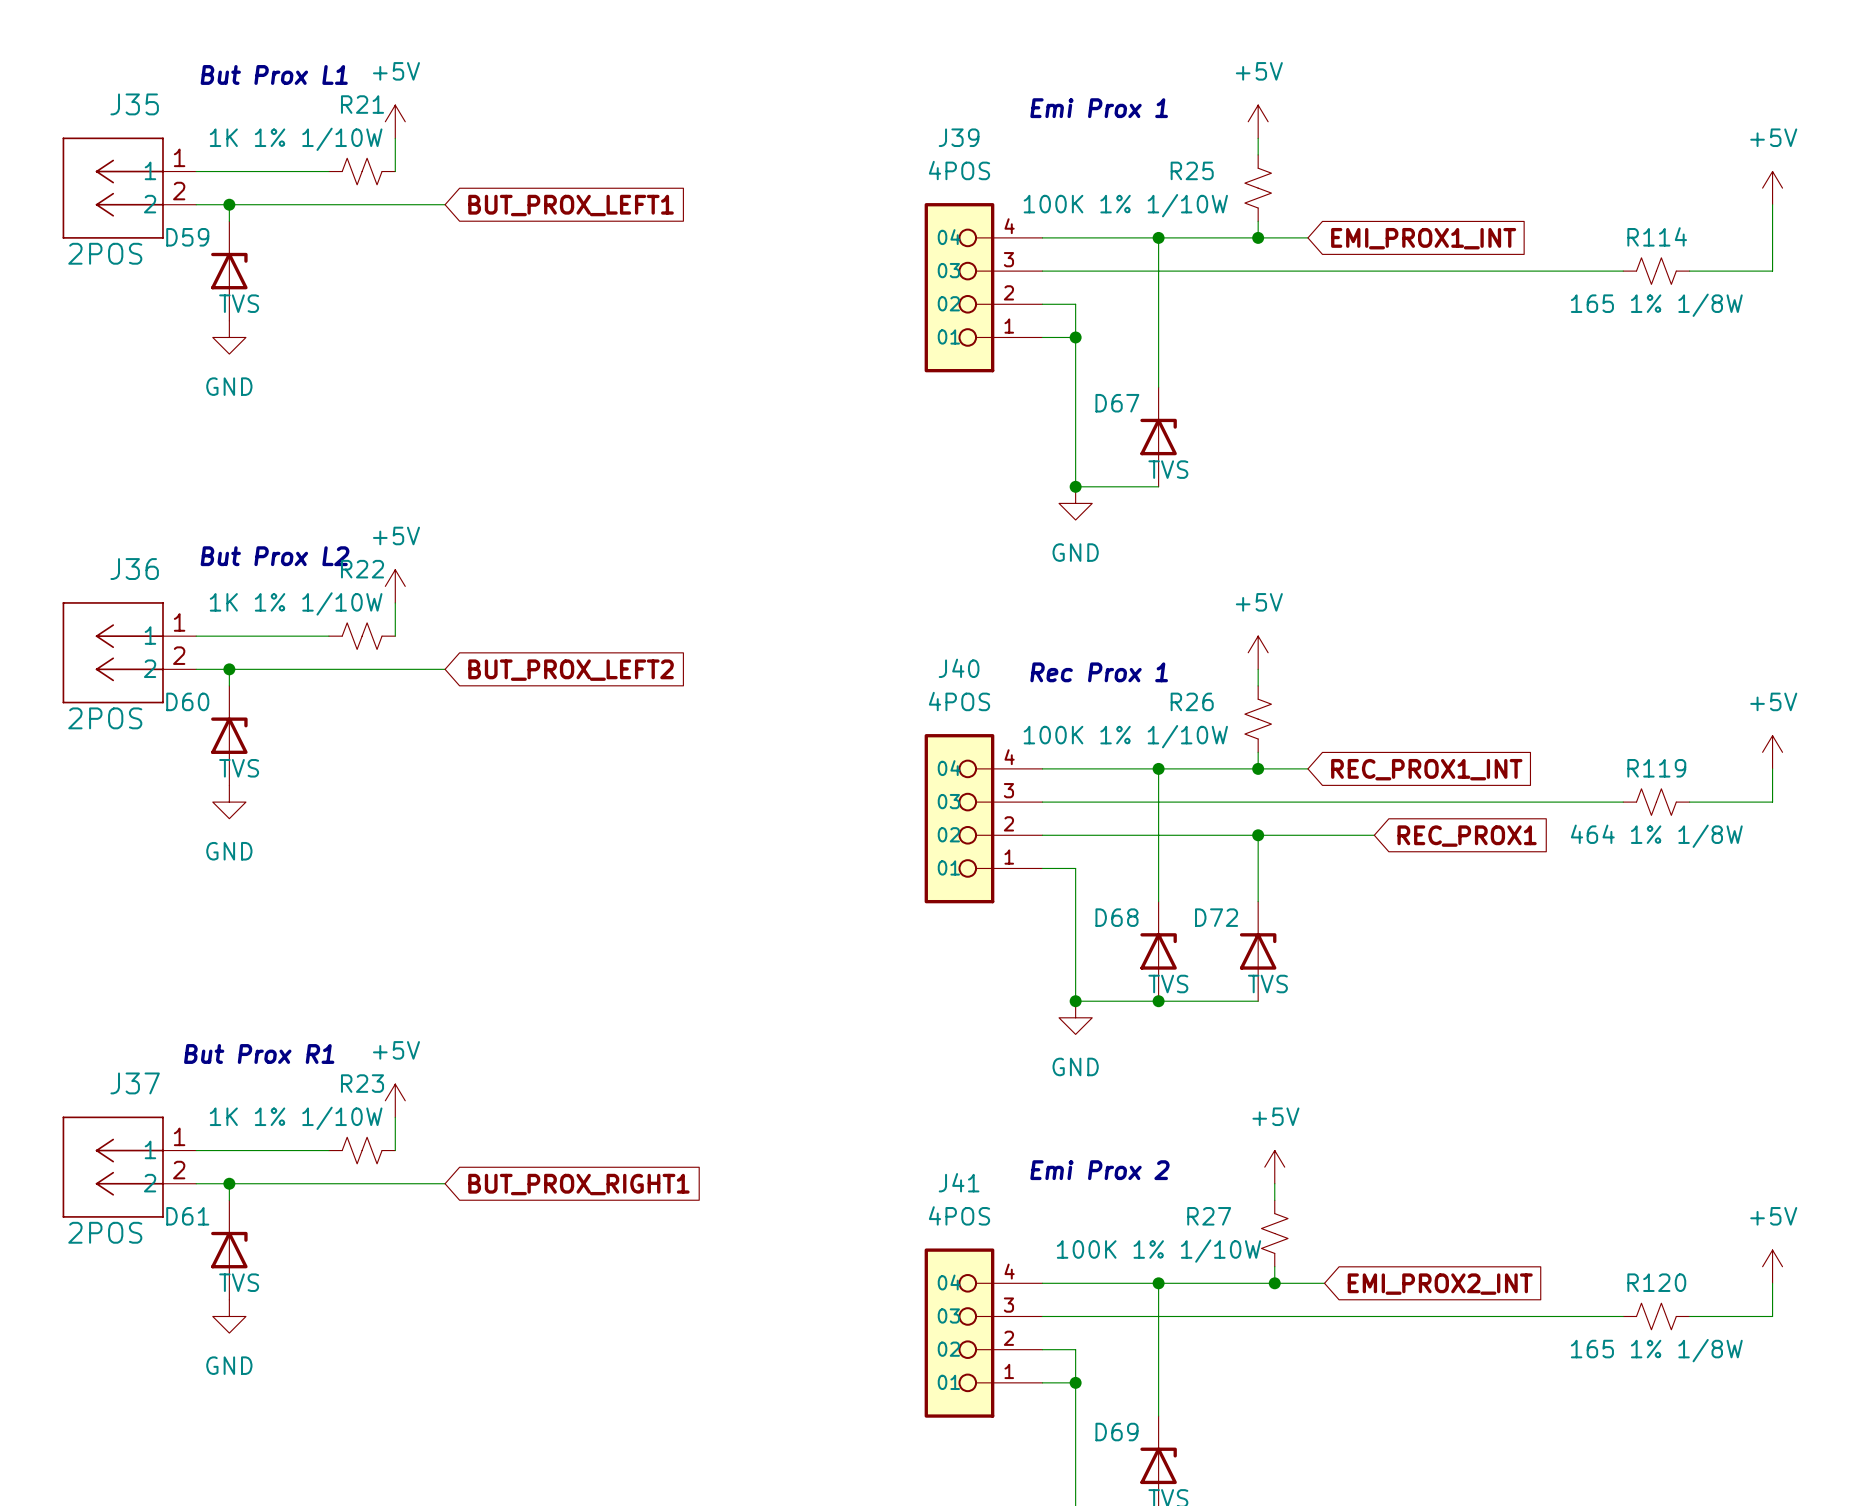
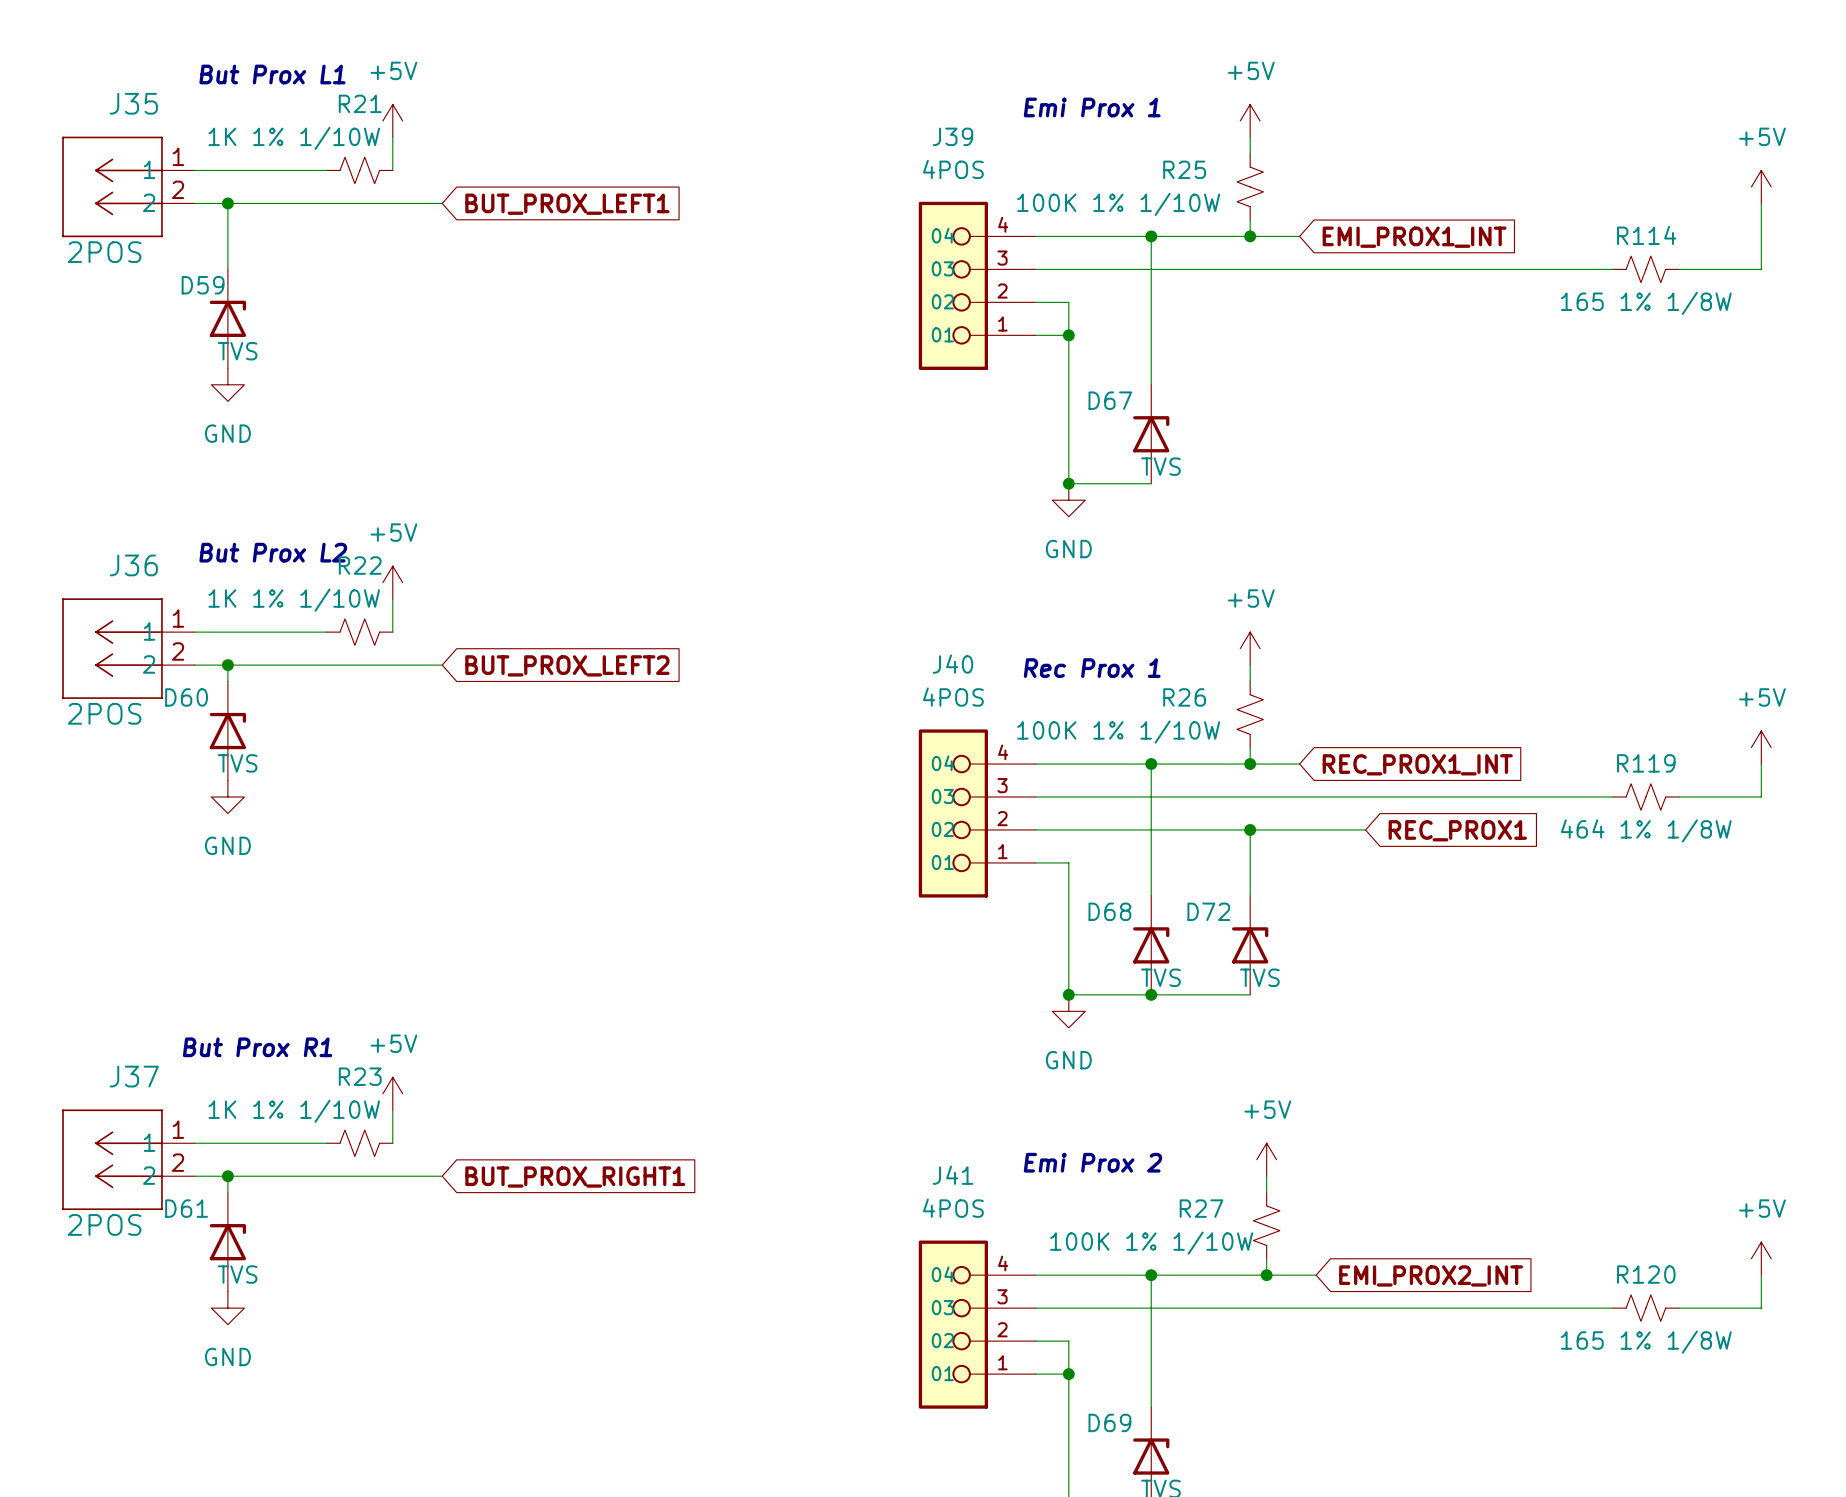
D59 name position: D59 (187, 237) -> D59 (203, 285)
D59 position: (229, 271) -> (227, 318)
power symbol position: GND (229, 337) -> GND (227, 384)

